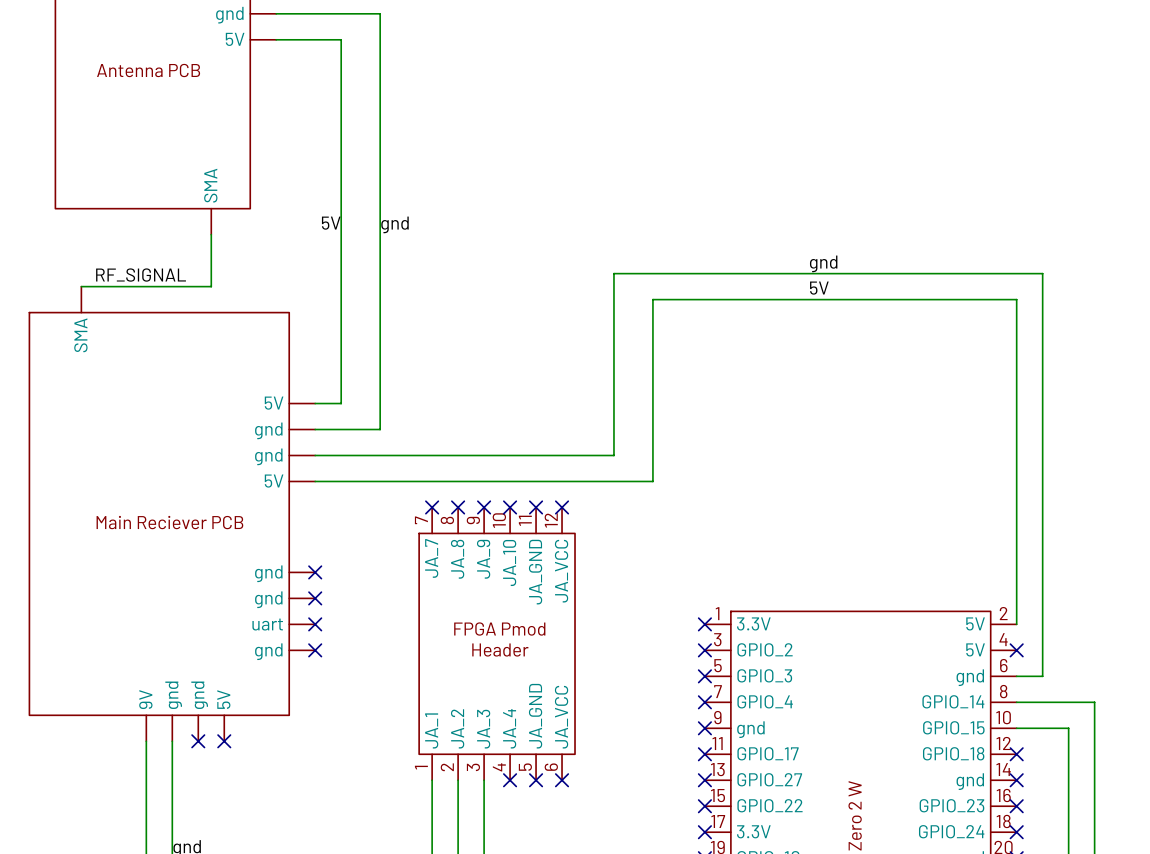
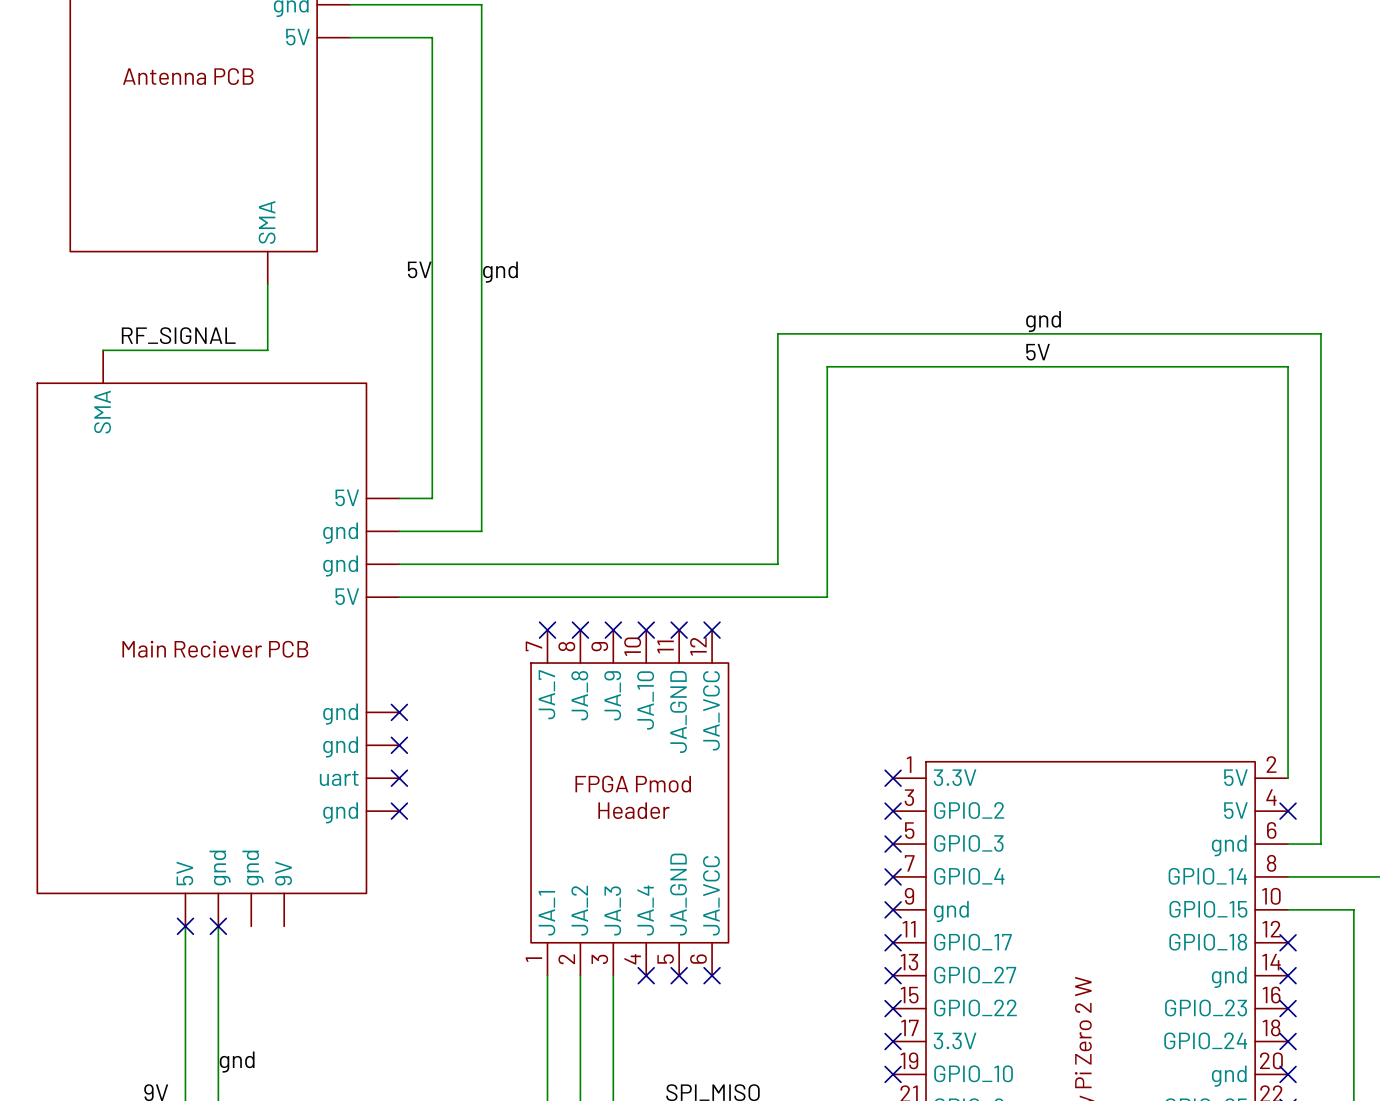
part pin name: 9V (145, 699) -> 5V (184, 873)
part pin name: 5V (223, 699) -> 9V (283, 873)
no-connect mark: none -> (185, 926)
no-connect mark: none -> (218, 926)
no-connect mark: (198, 741) -> none
no-connect mark: (224, 741) -> none

